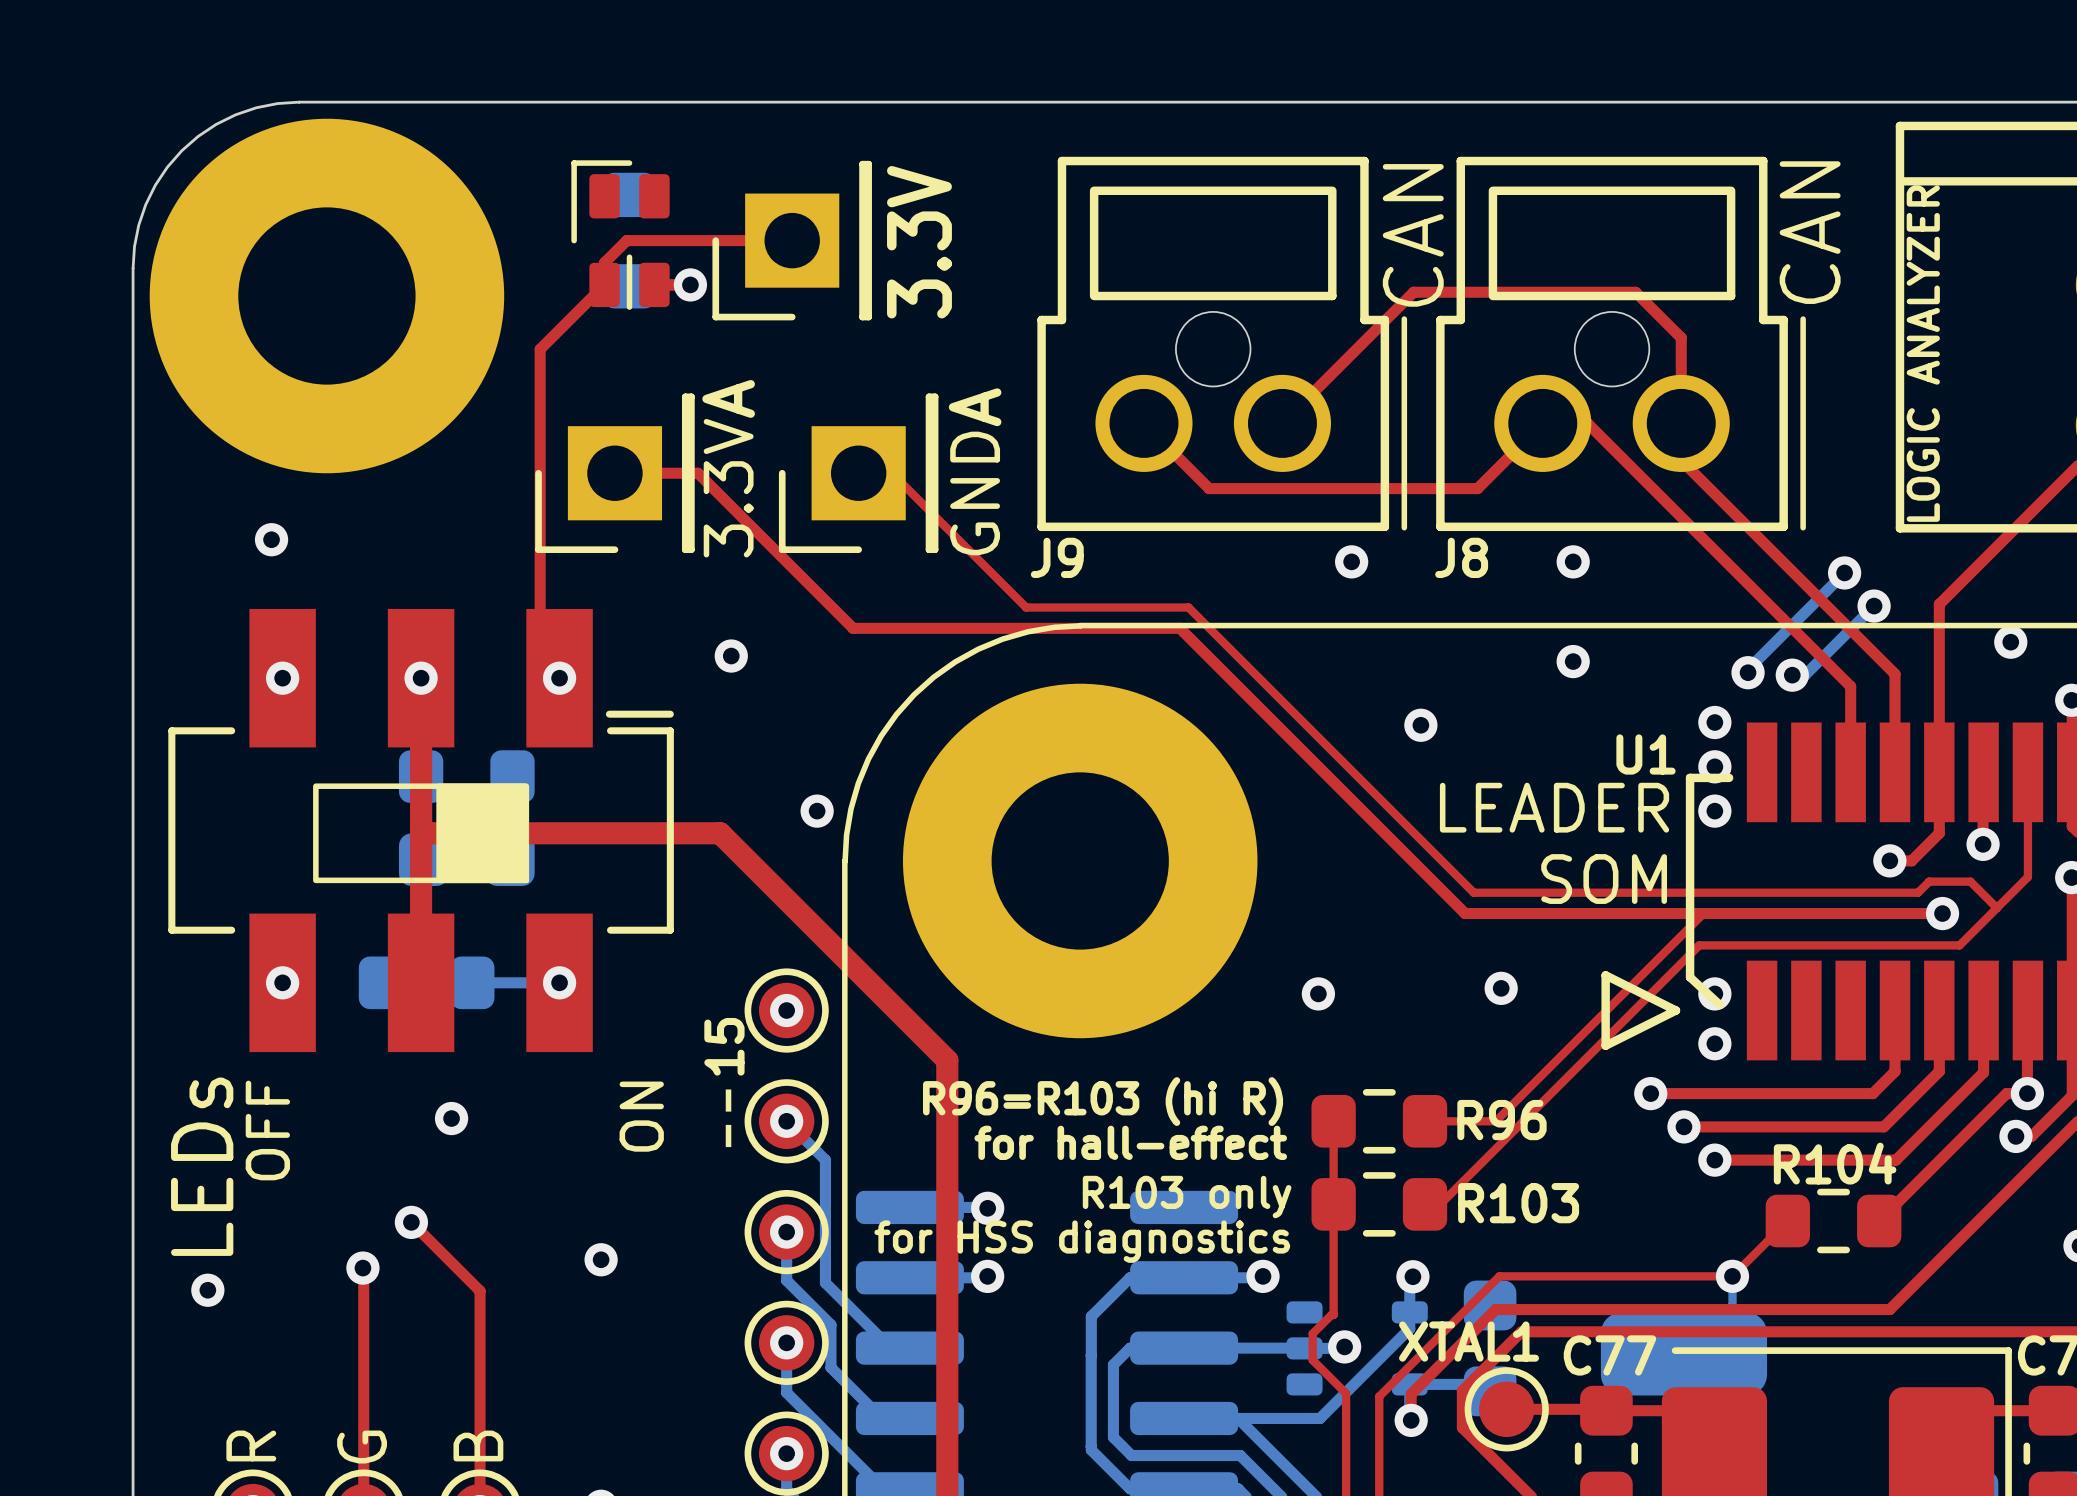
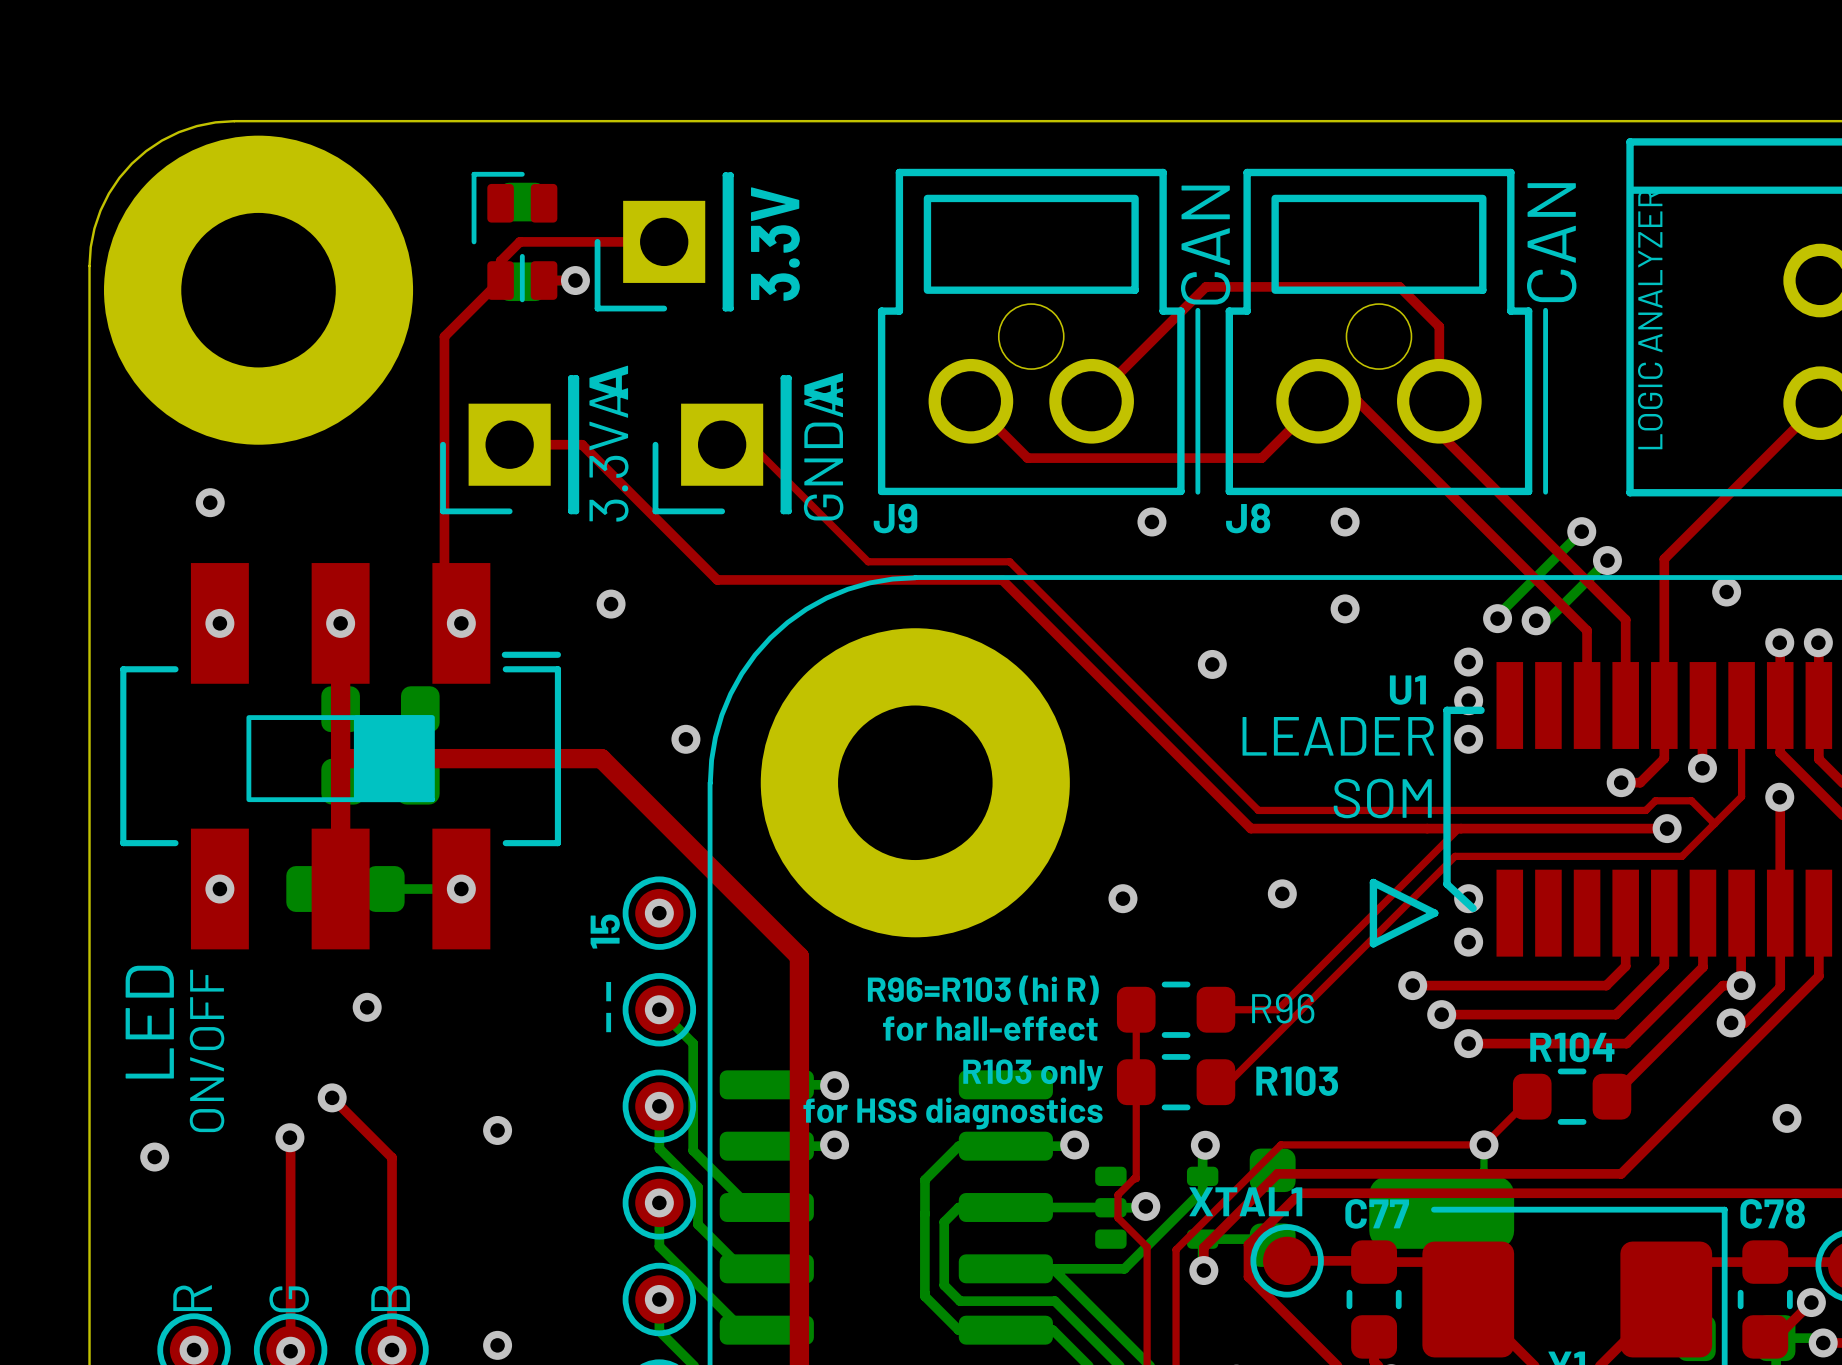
text: ON (641, 1116) -> none
text: OFF (267, 1130) -> ON/OFF (207, 1050)
text: LEDs (202, 1166) -> LED (149, 1022)

